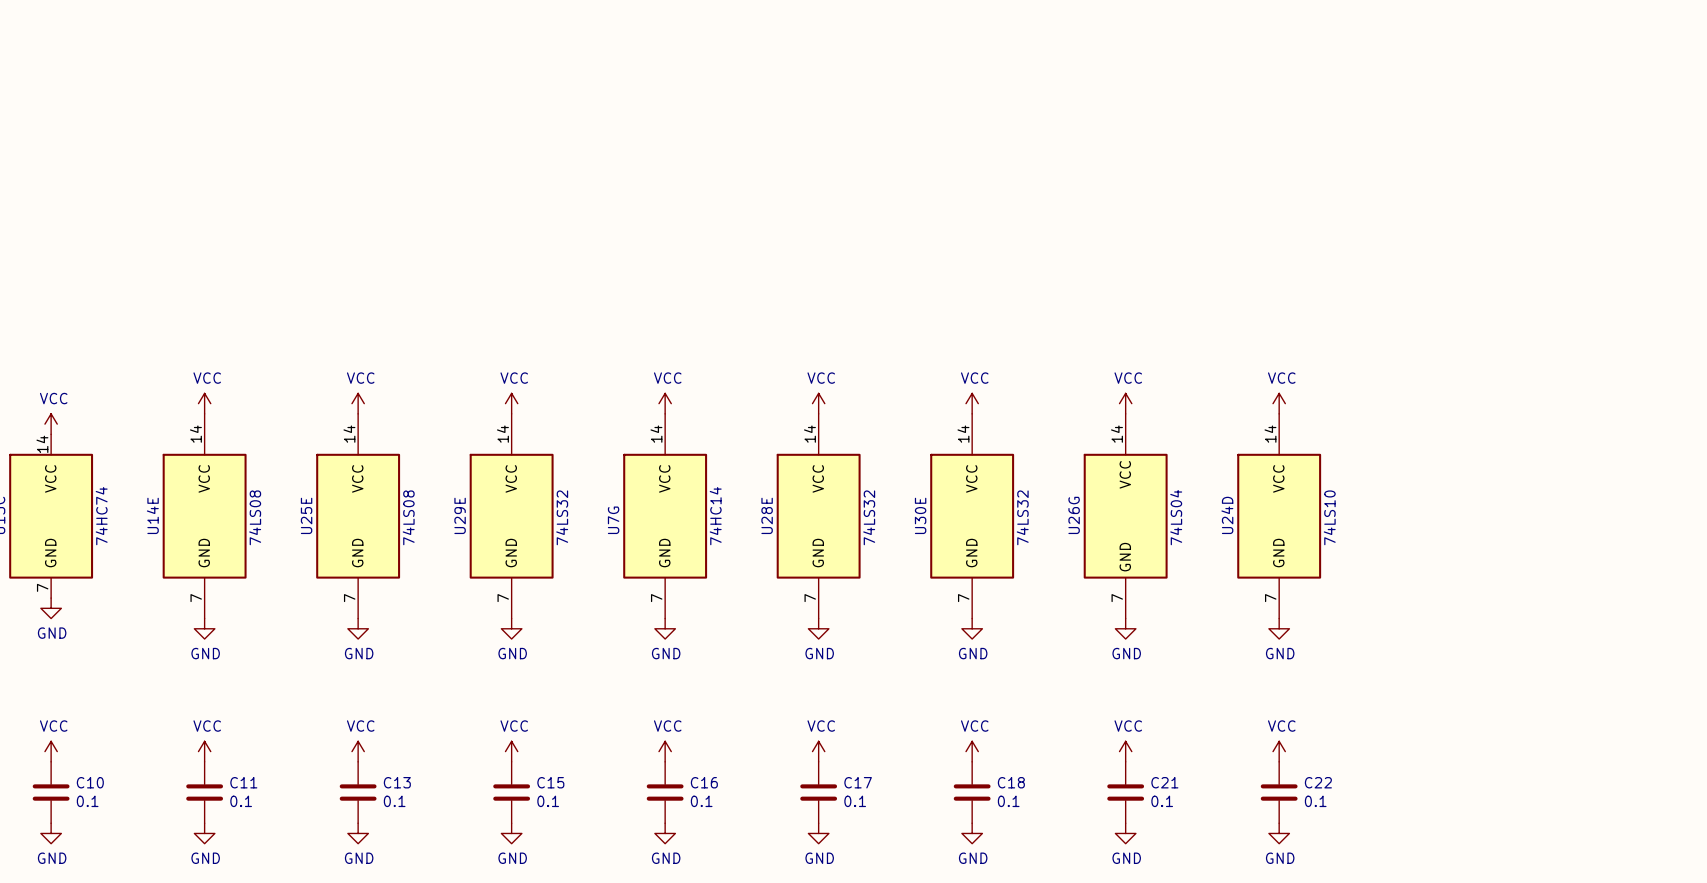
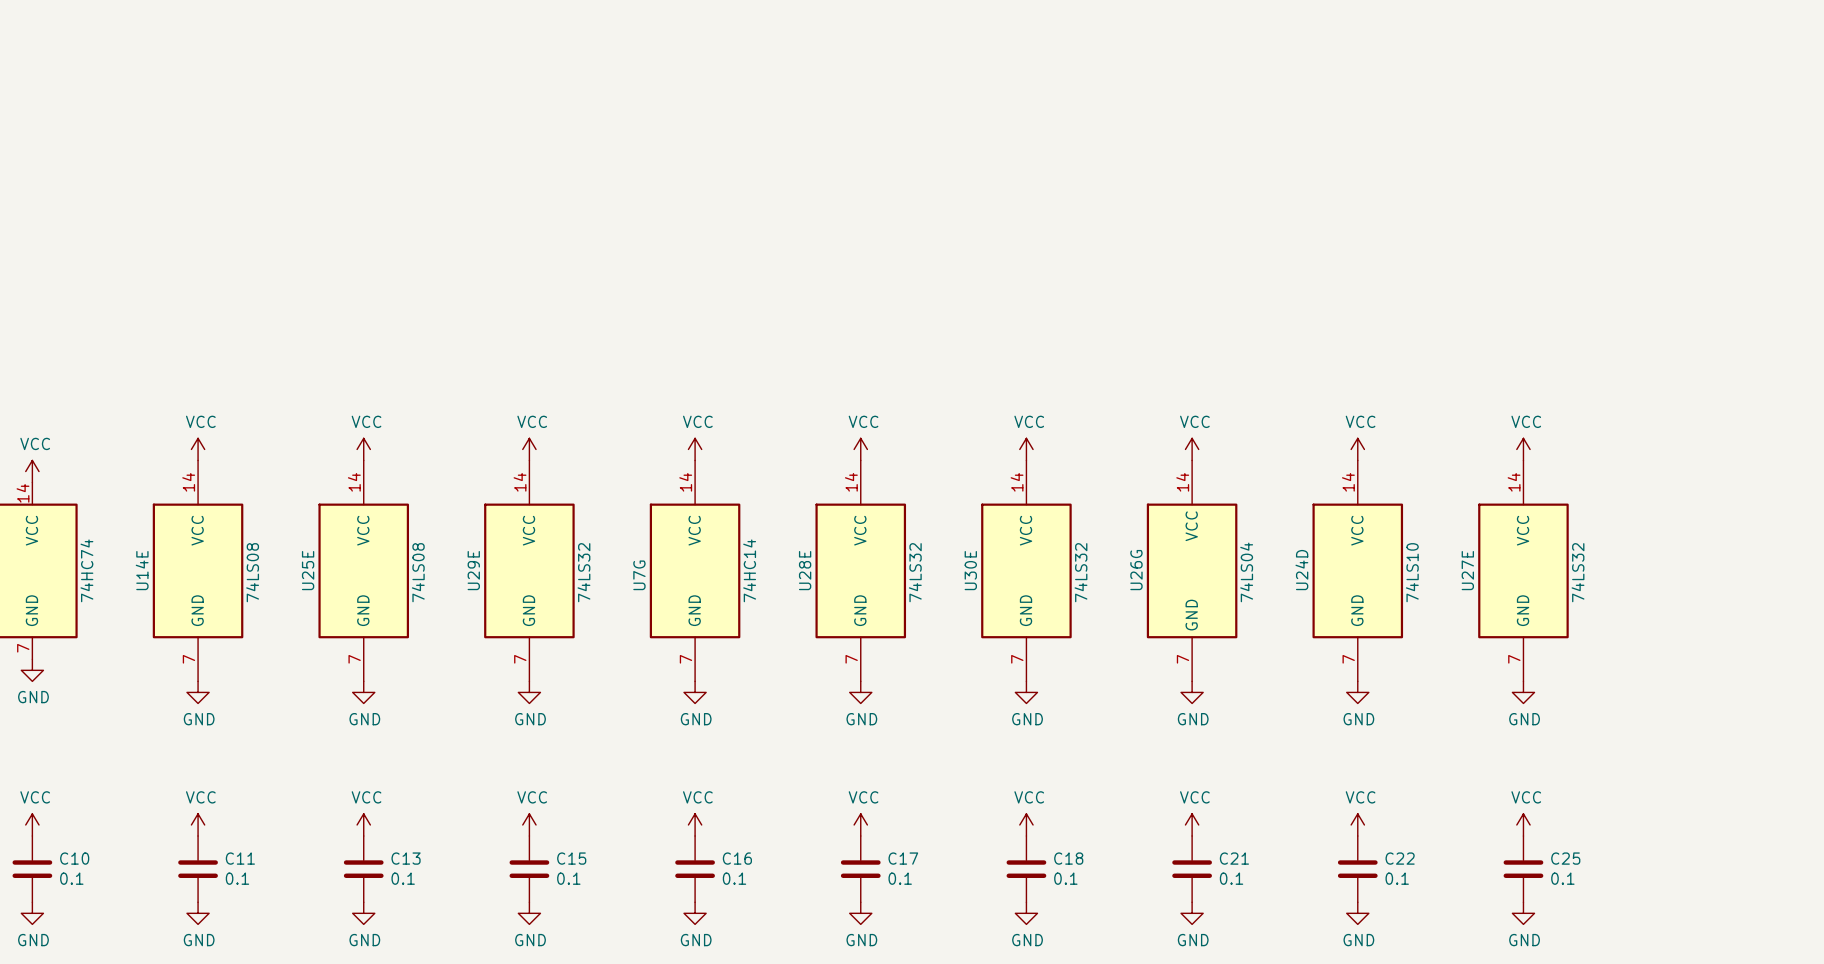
power symbol: none -> VCC (1523, 449)
U27E: none -> 74LS32 (1523, 570)
power symbol: none -> GND (1523, 692)
power symbol: none -> VCC (1523, 824)
C25: none -> 0.1 (1523, 869)
power symbol: none -> GND (1523, 913)

